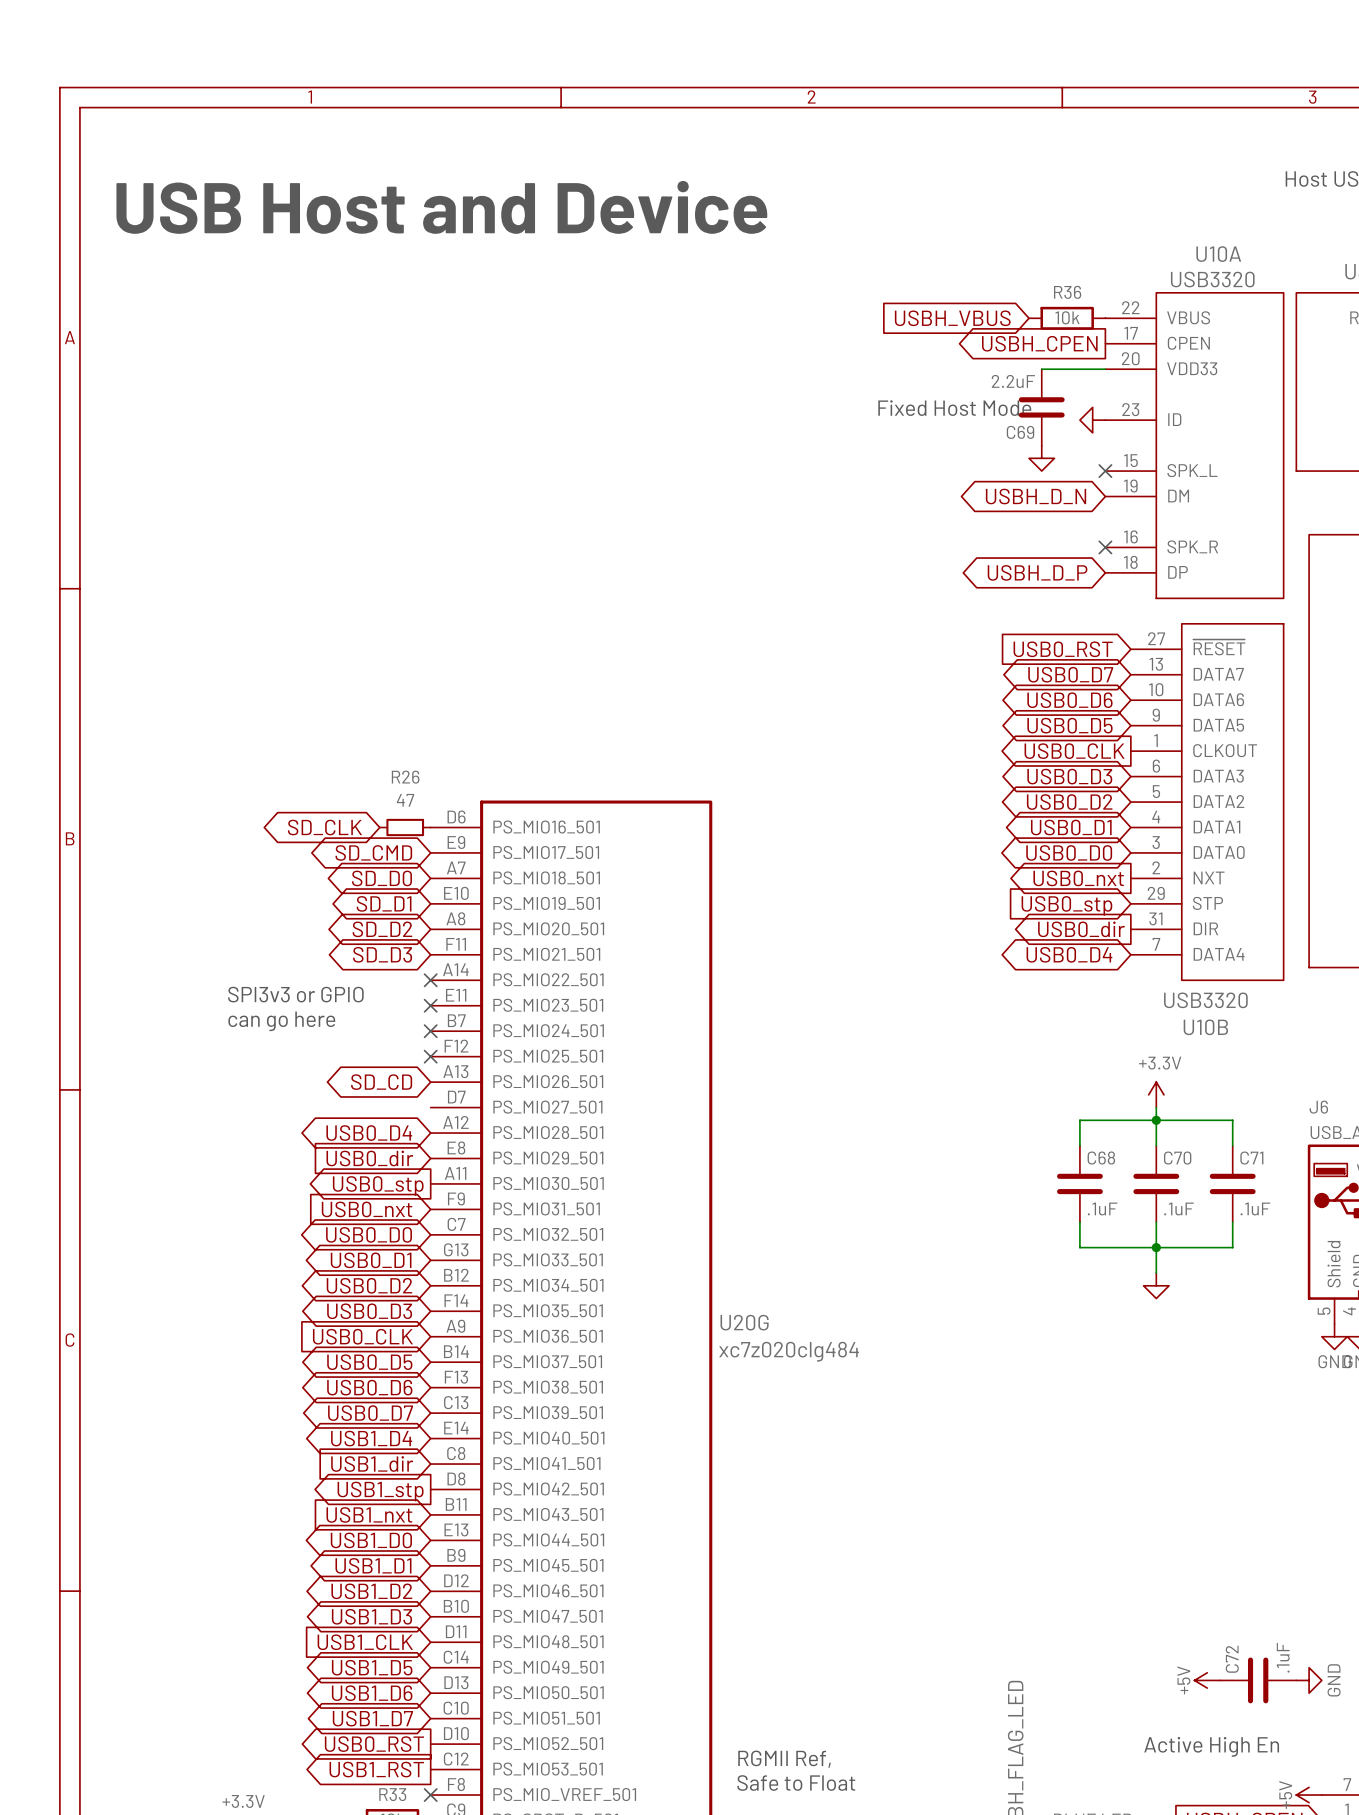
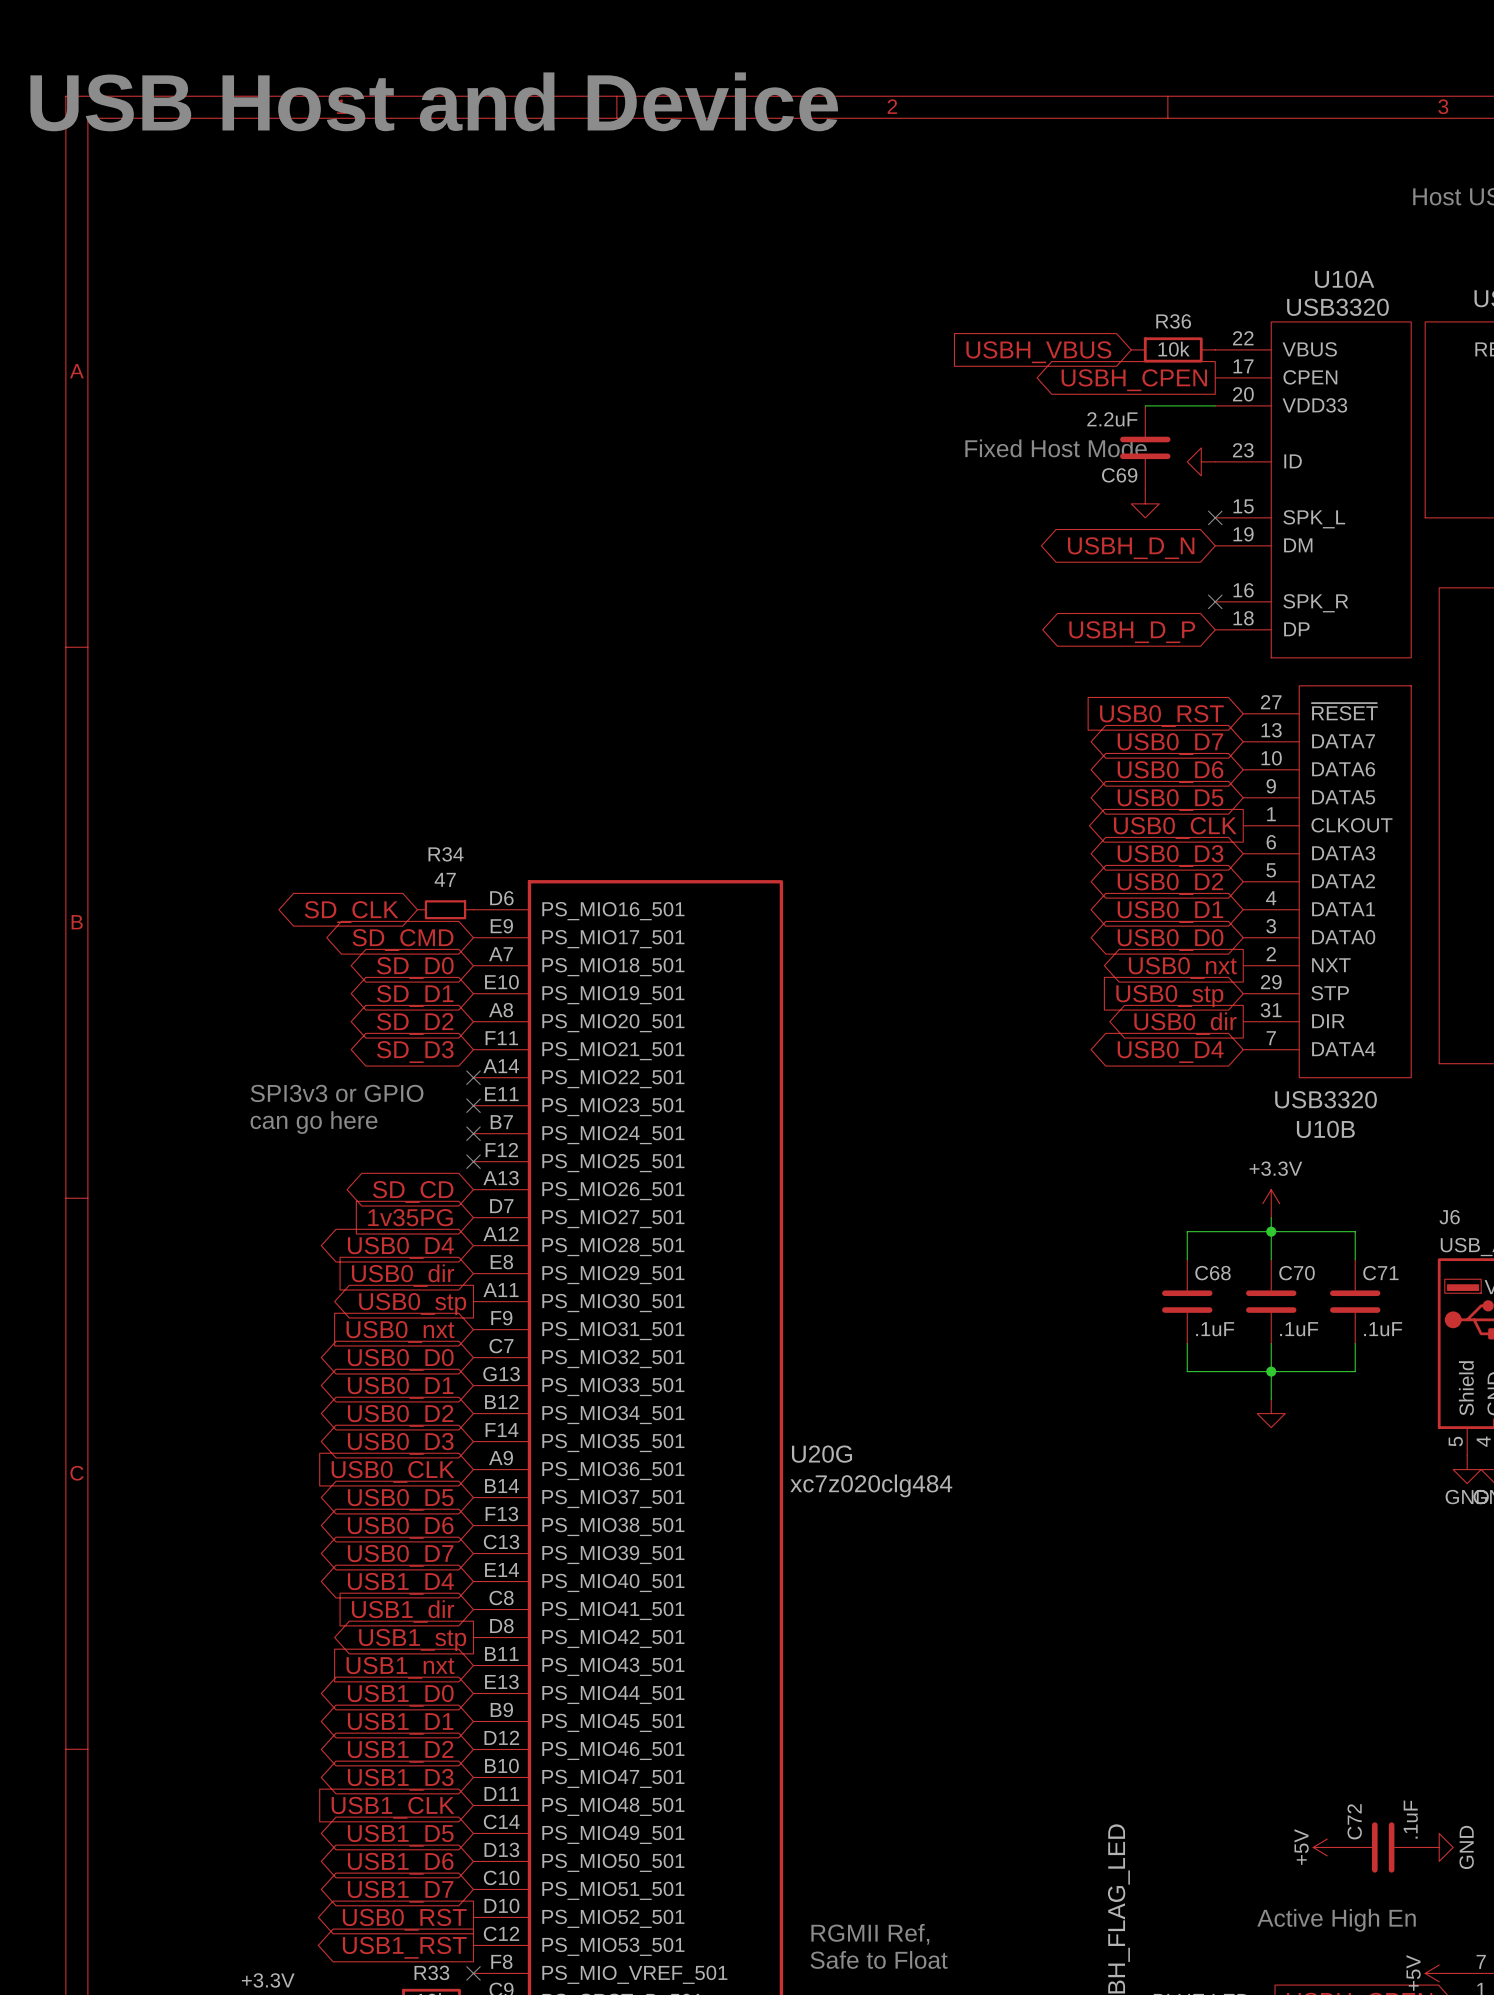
text position: USB Host and Device (441, 207) -> USB Host and Device (434, 101)
R26 name: R26 (405, 777) -> R34 (446, 854)
global label: none -> 1v35PG (410, 1217)

